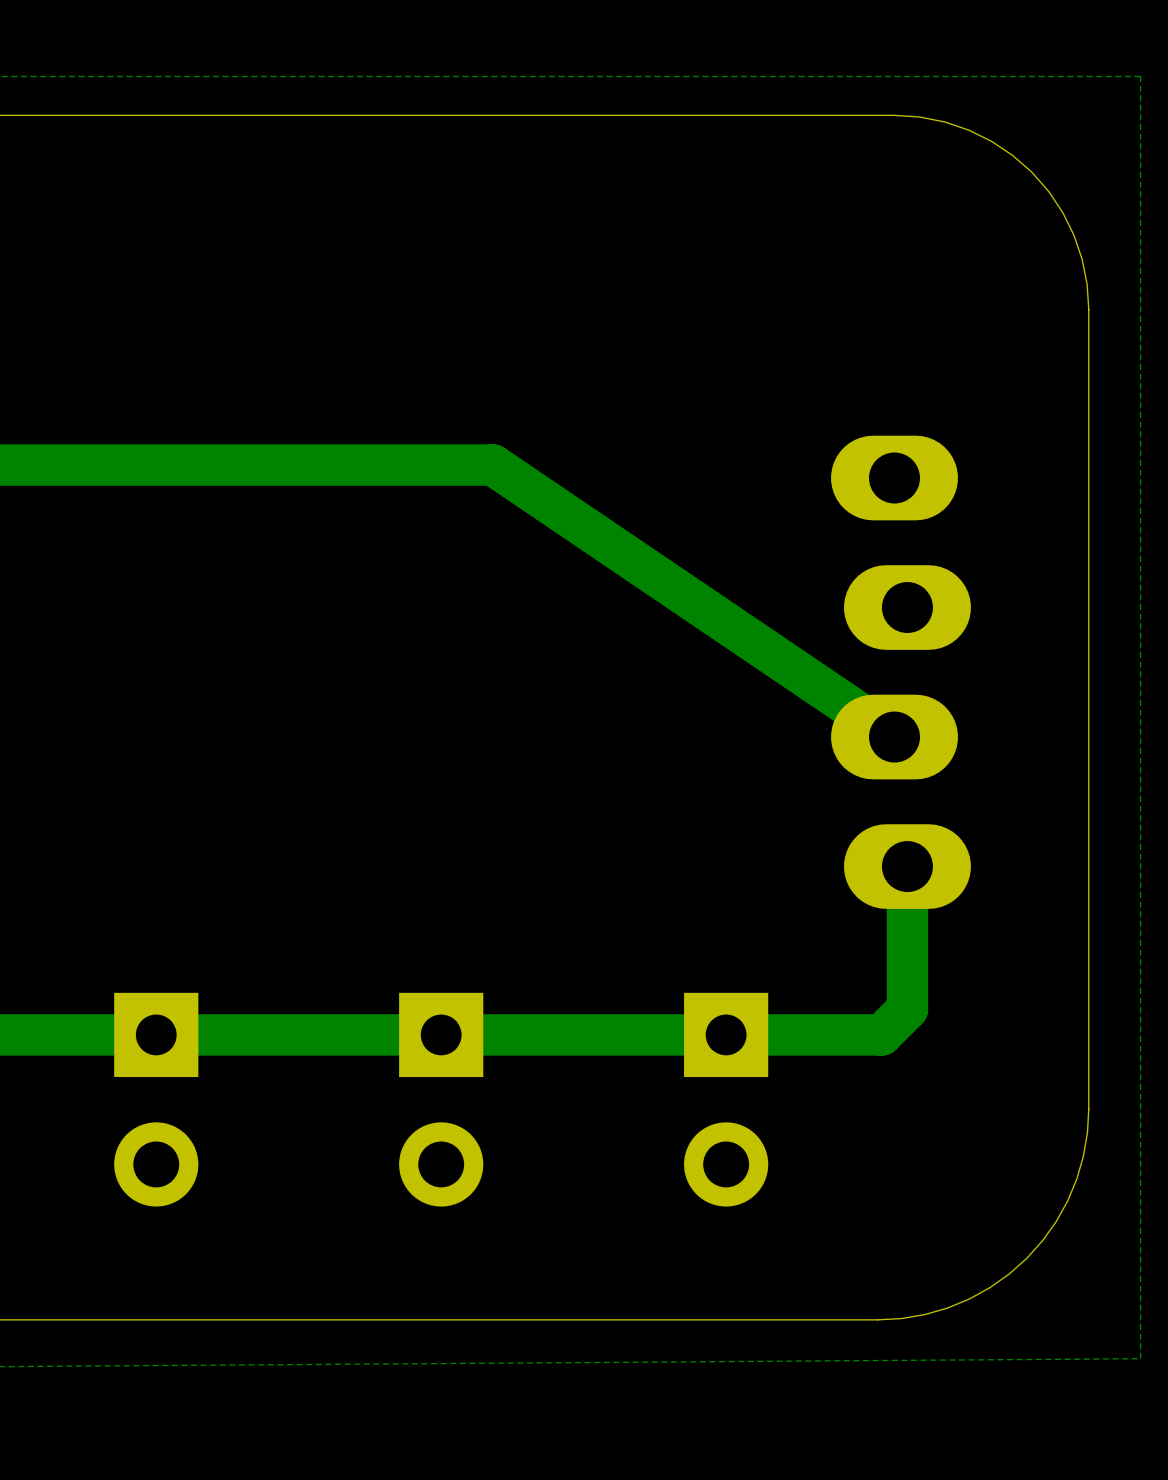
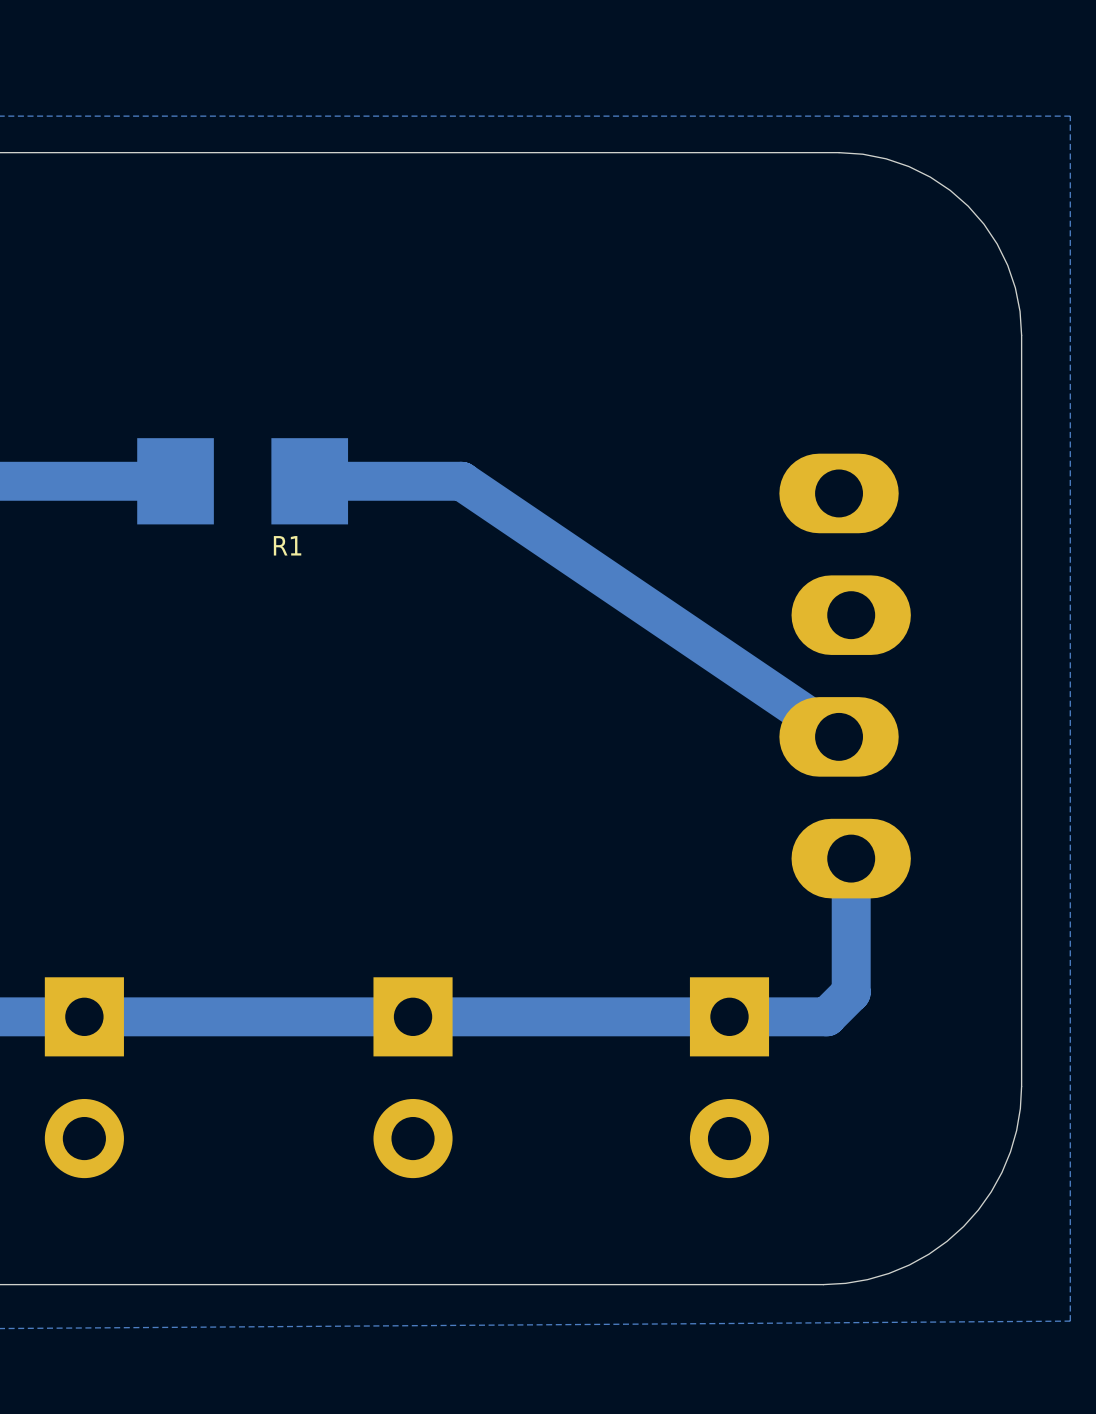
R1: none -> (242, 481)
track: (331, 465) (188, 465) -> none
part position: (156, 1099) -> (84, 1077)
part position: (726, 1099) -> (729, 1077)

